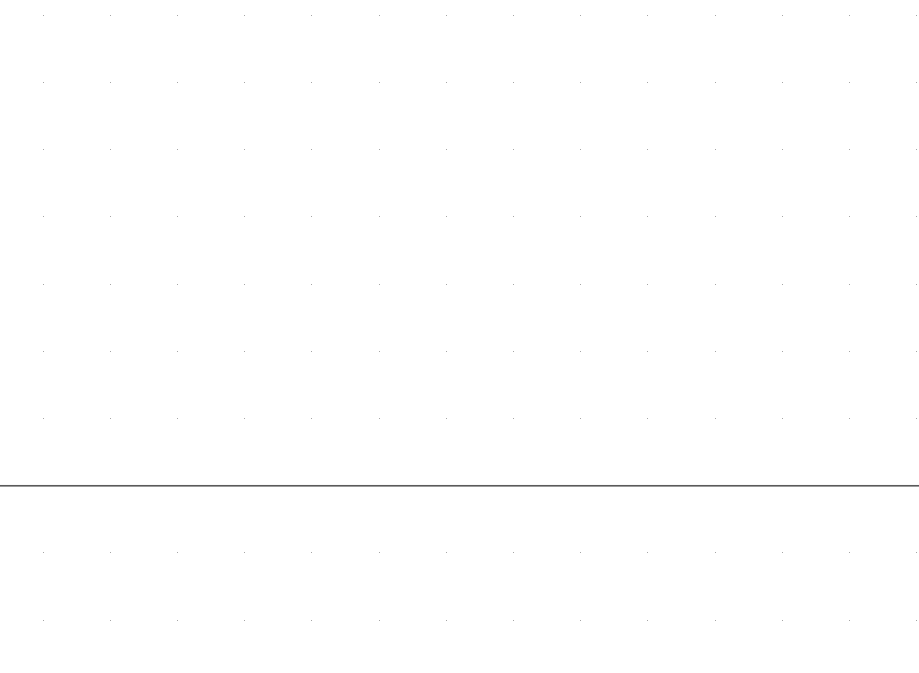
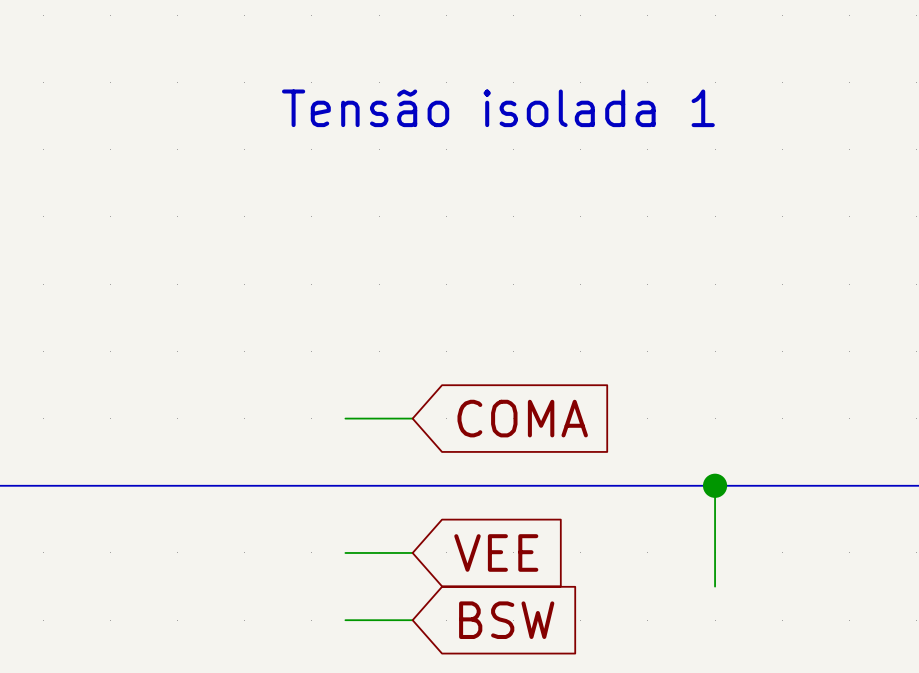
text: none -> Tensão isolada 1 (498, 108)
wire: none -> (345, 418) (412, 418)
global label: none -> COMA (522, 418)
wire: none -> (715, 485) (715, 586)
junction: none -> (715, 485)
wire: none -> (345, 552) (412, 552)
global label: none -> VEE (496, 552)
wire: none -> (345, 620) (412, 620)
global label: none -> BSW (506, 620)

